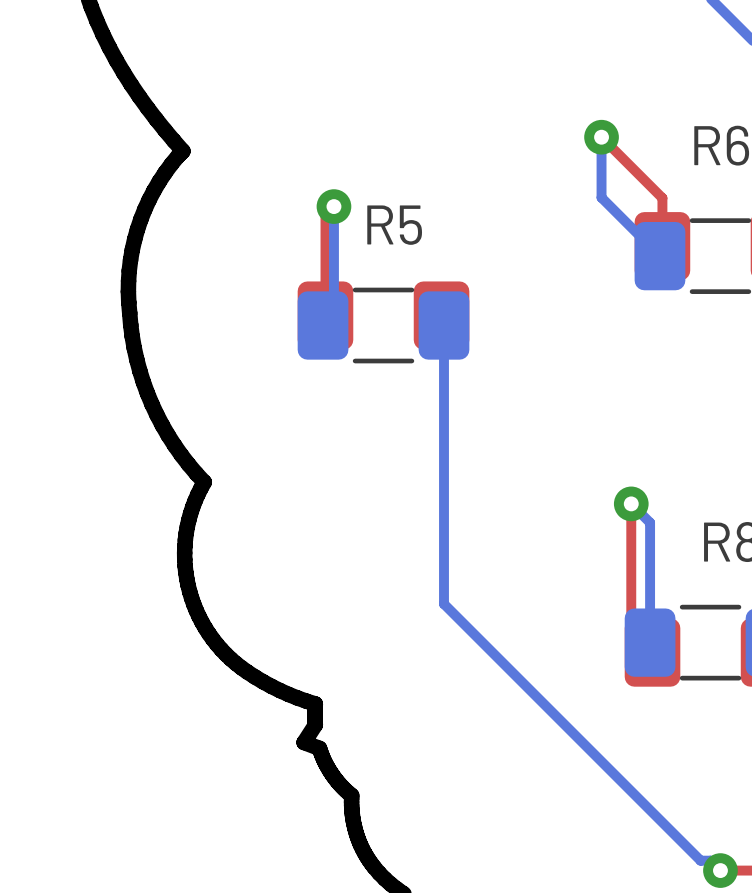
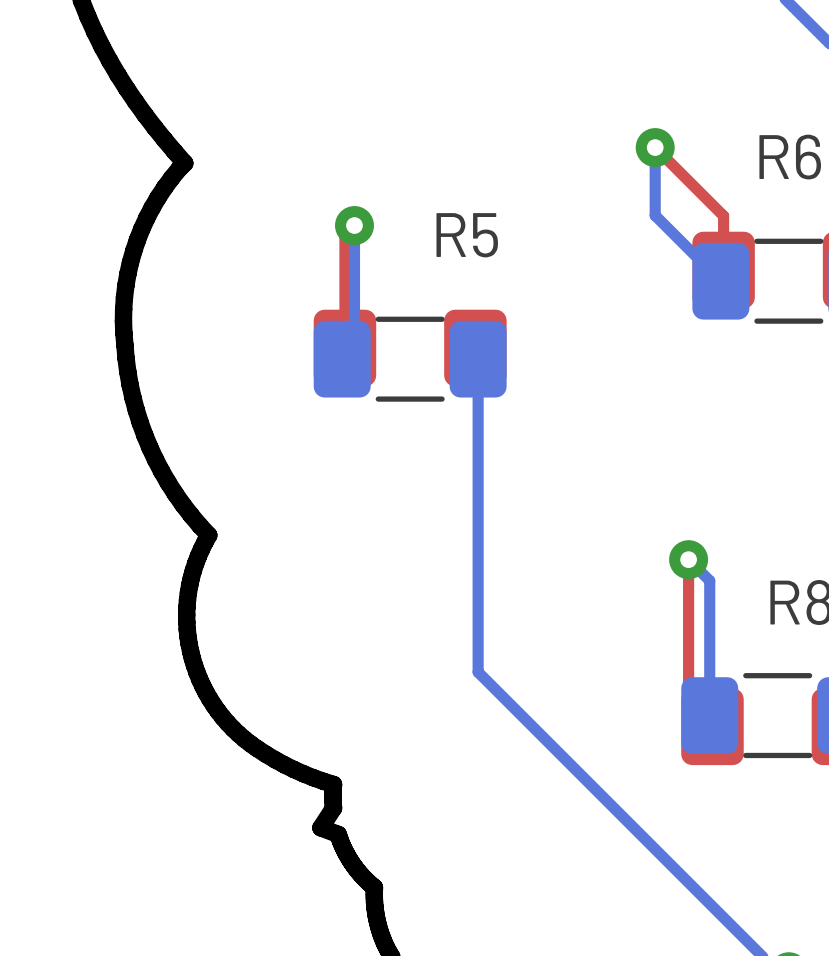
R5 name position: R5 (394, 225) -> R5 (467, 235)

